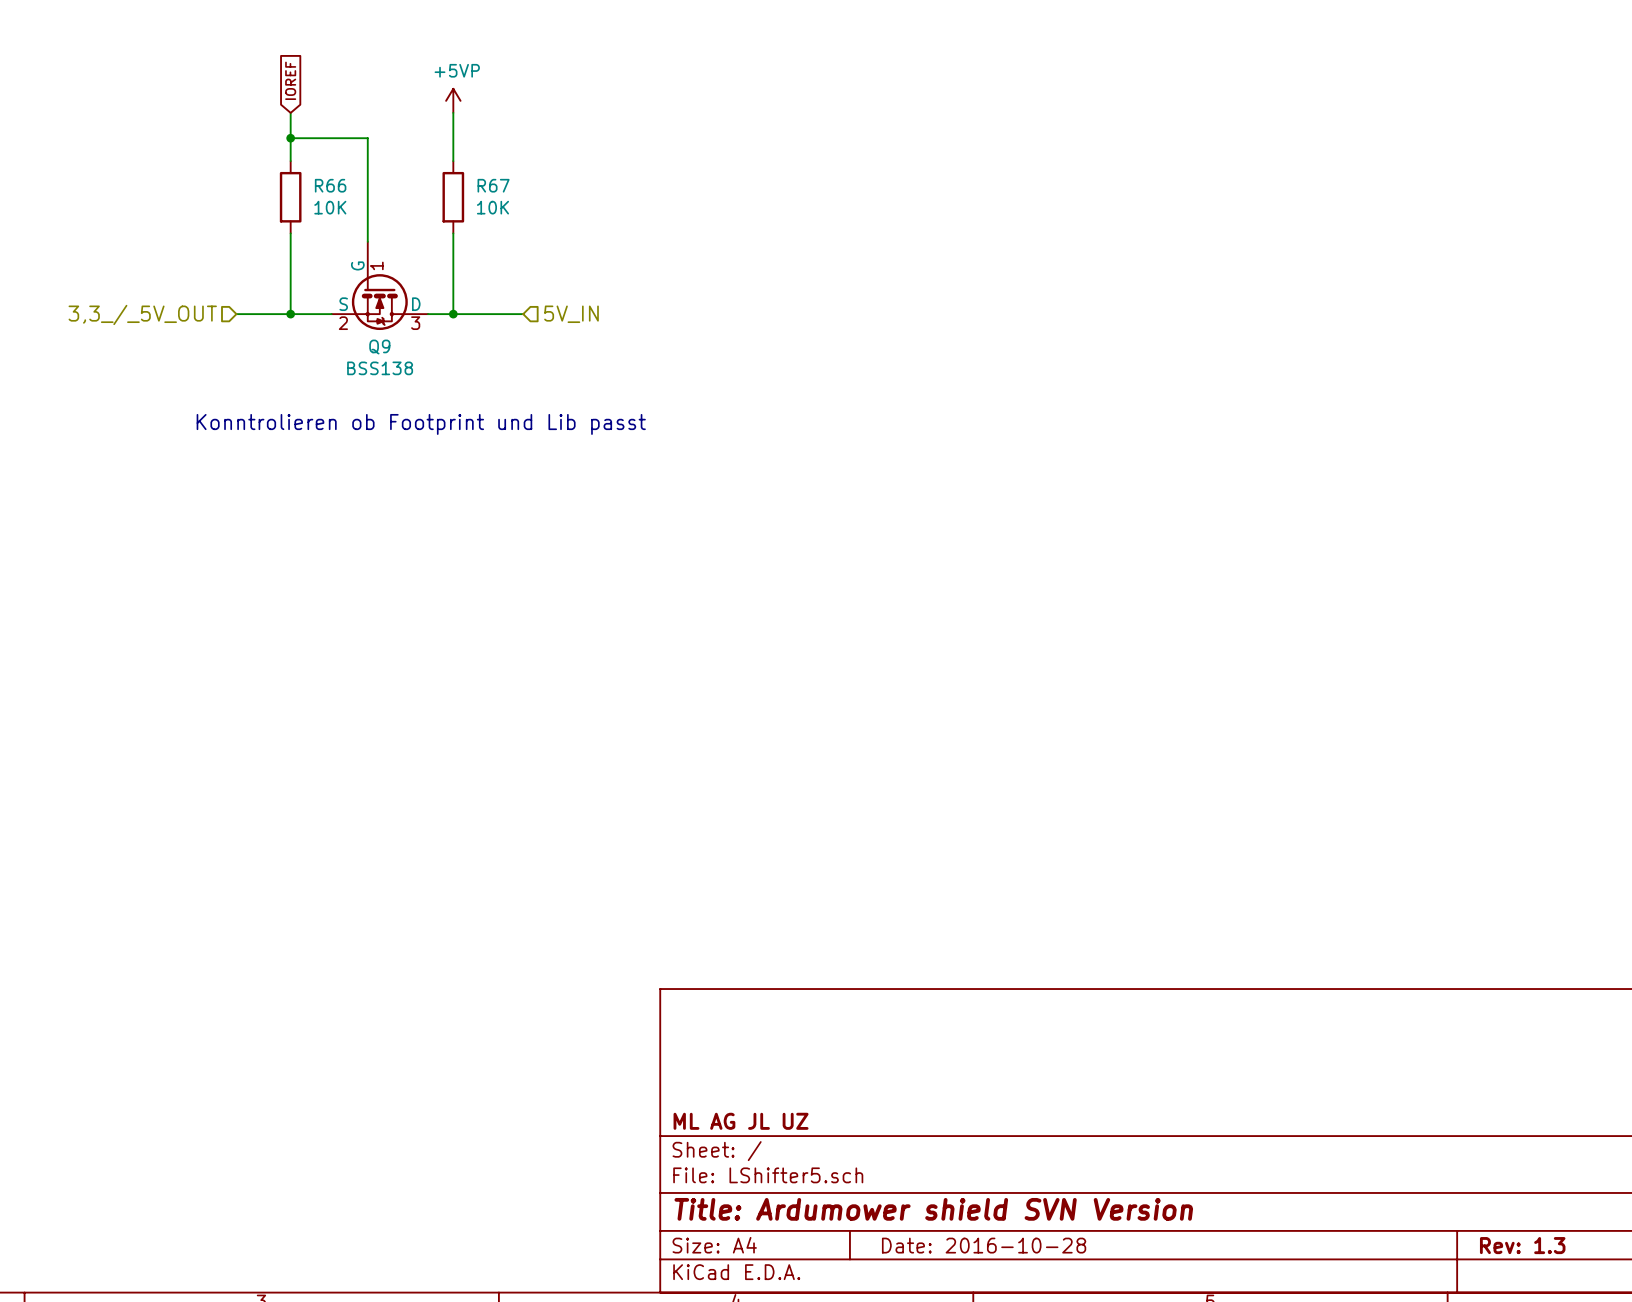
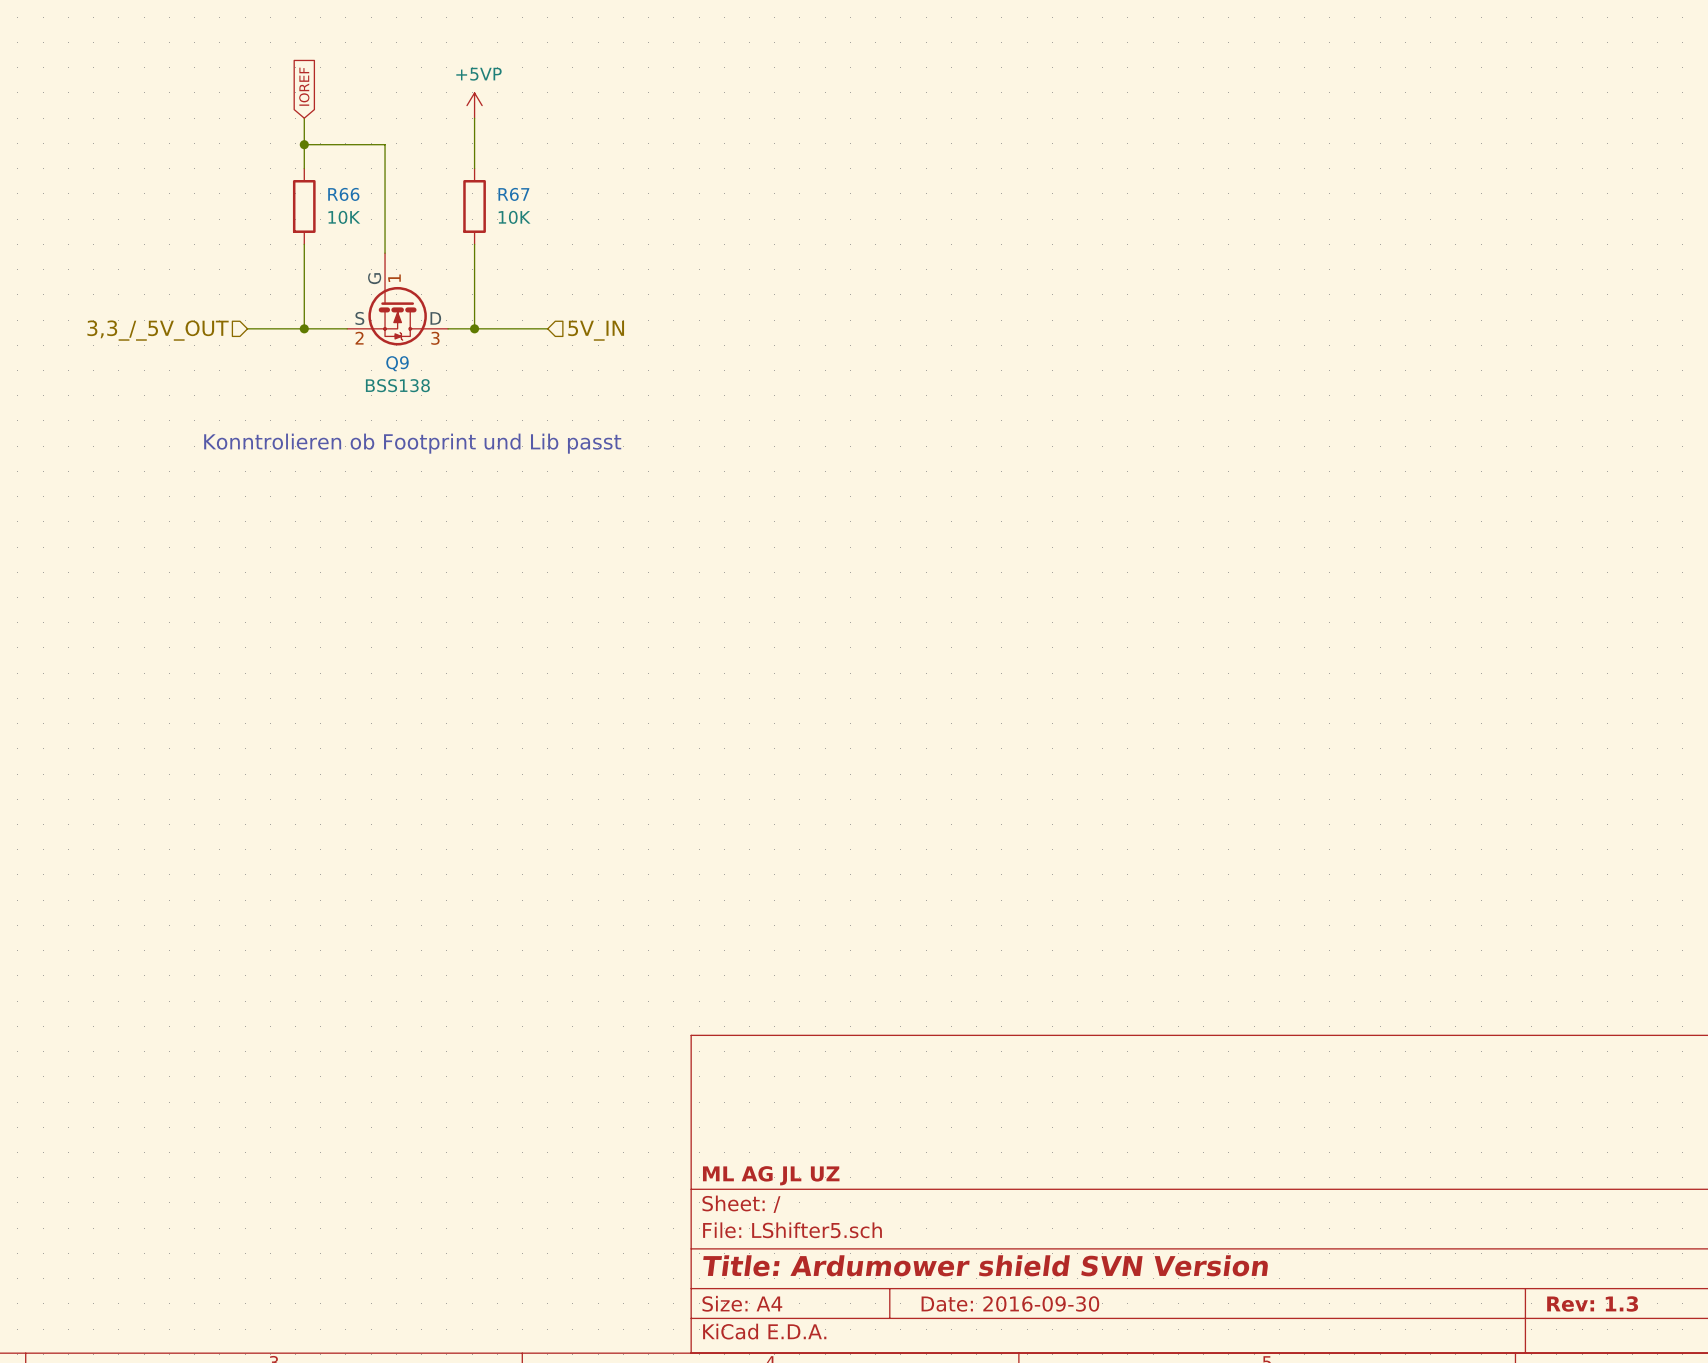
title block: Date: 2016-10-28 (984, 1245) -> Date: 2016-09-30 (1010, 1303)

